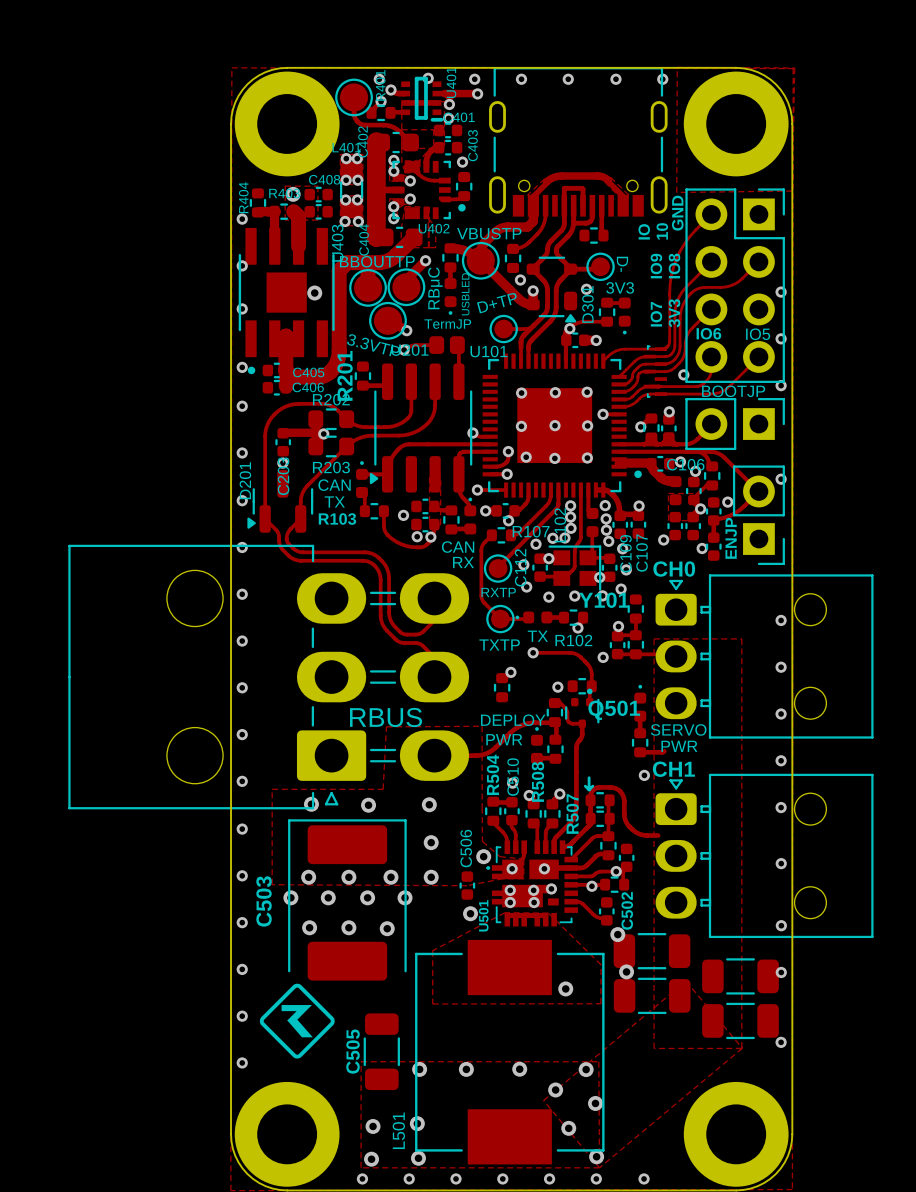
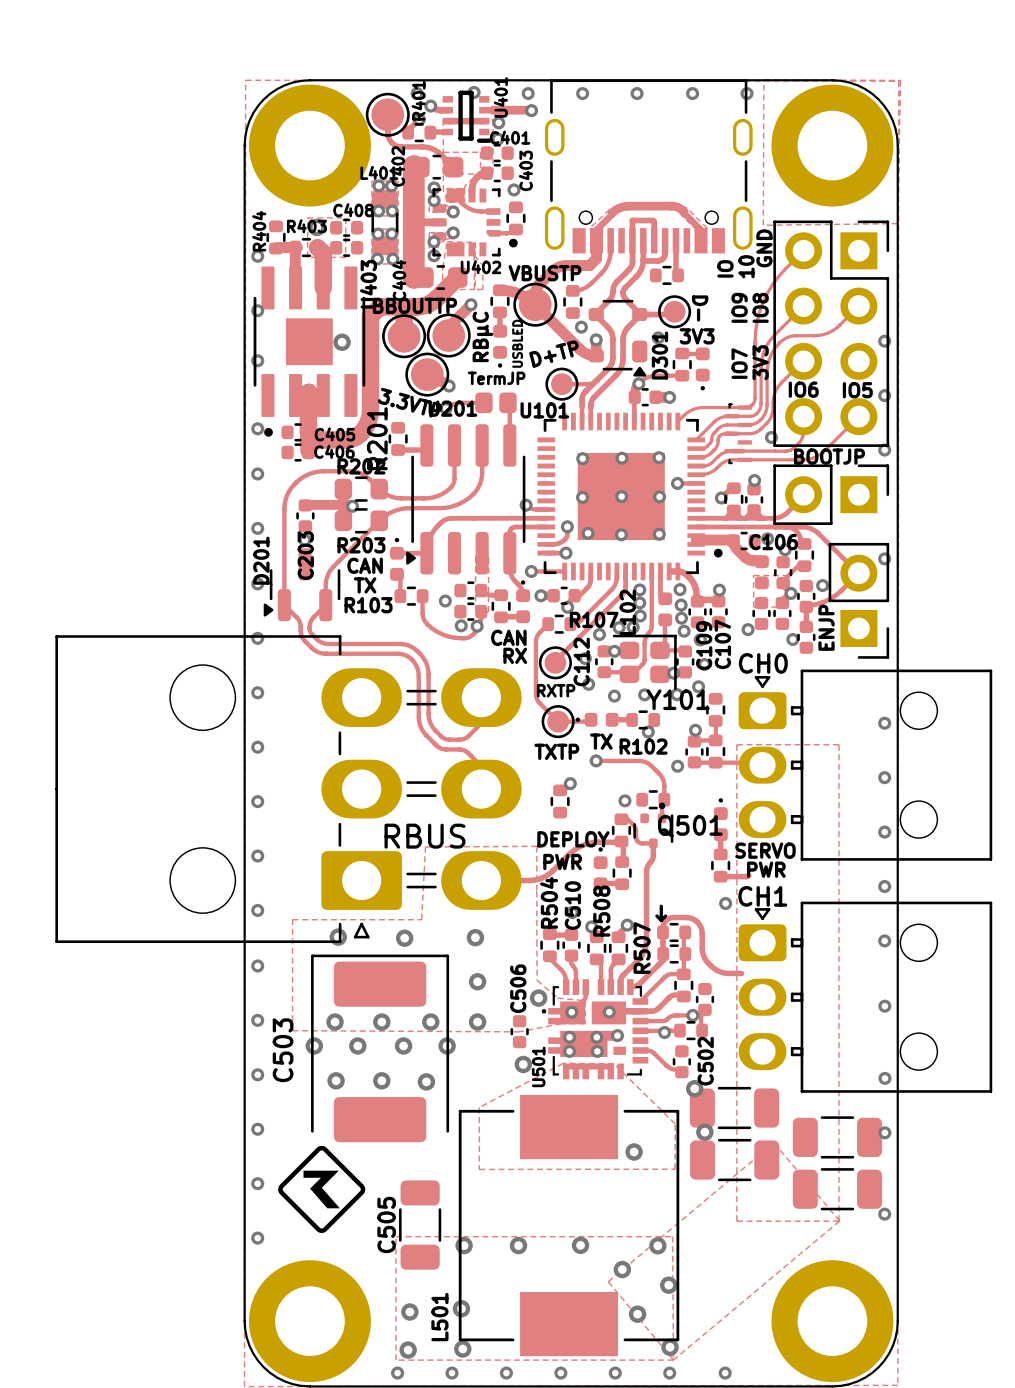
Y101 footprint: [548, 545, 602, 591] -> [612, 634, 677, 690]

